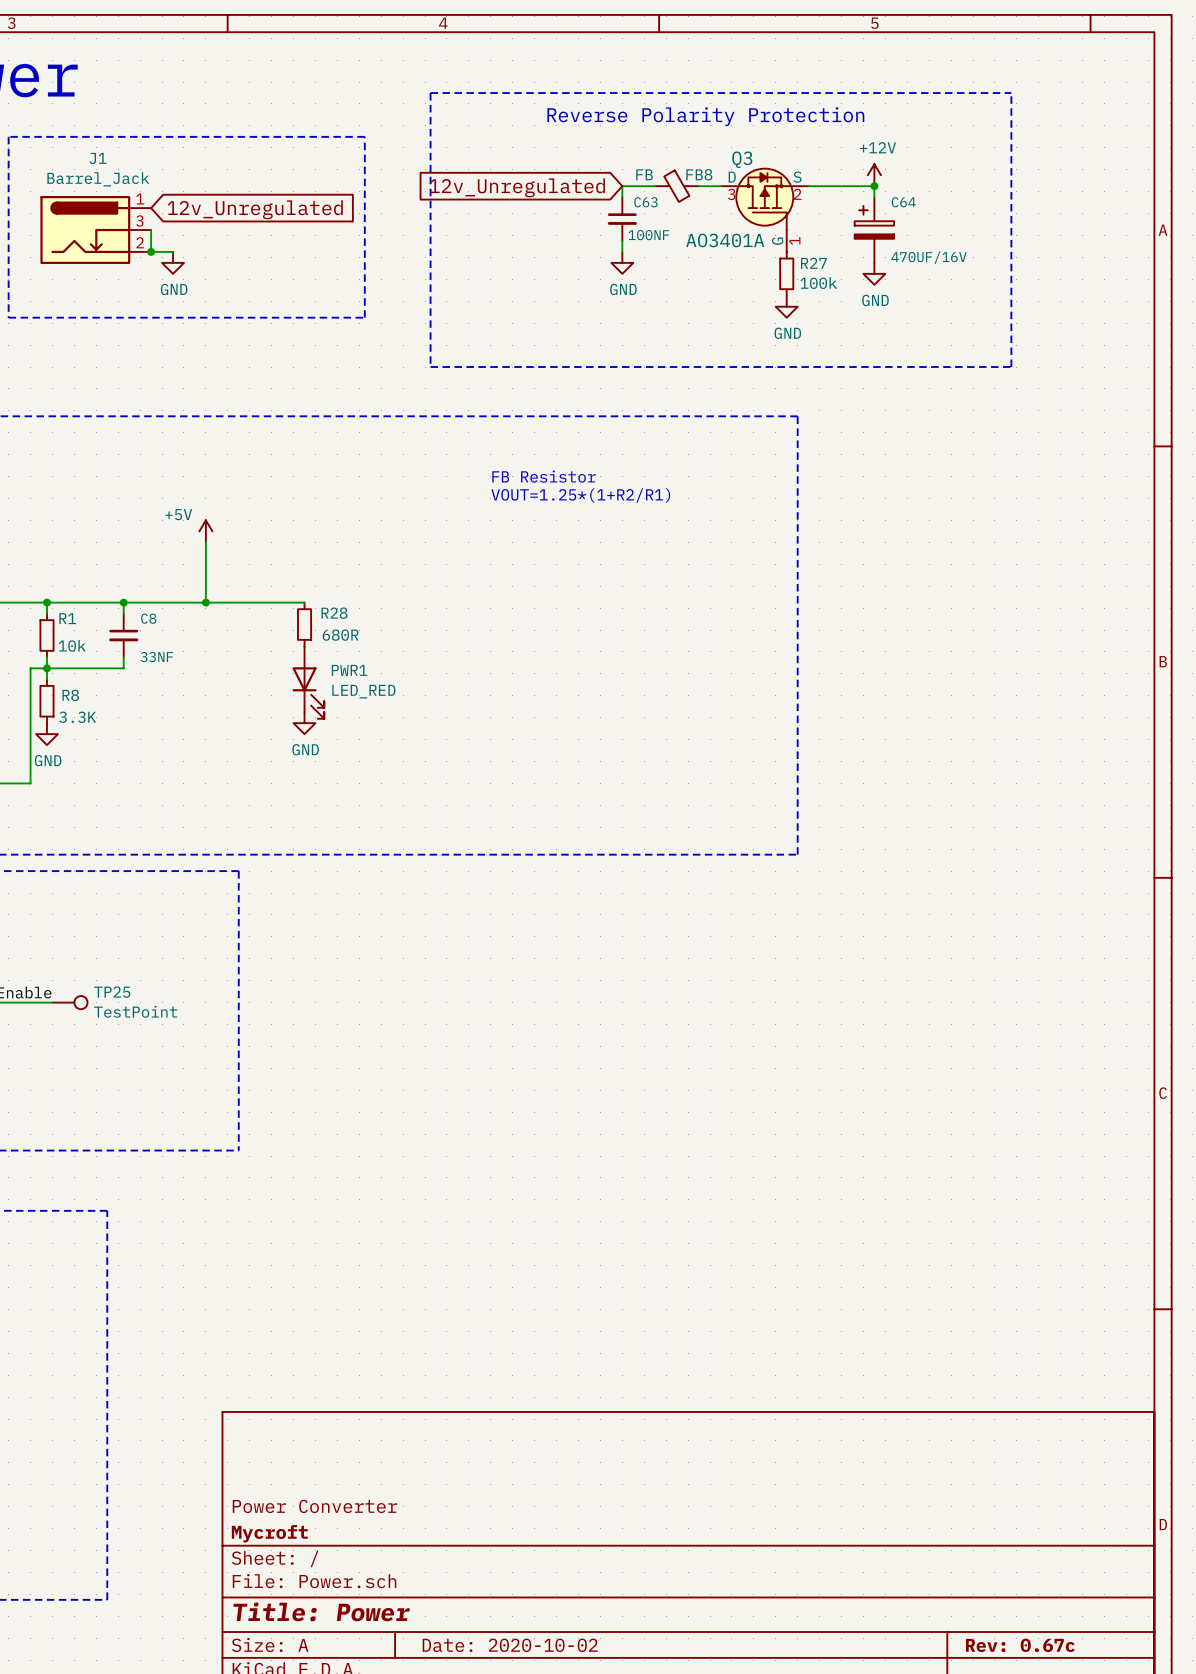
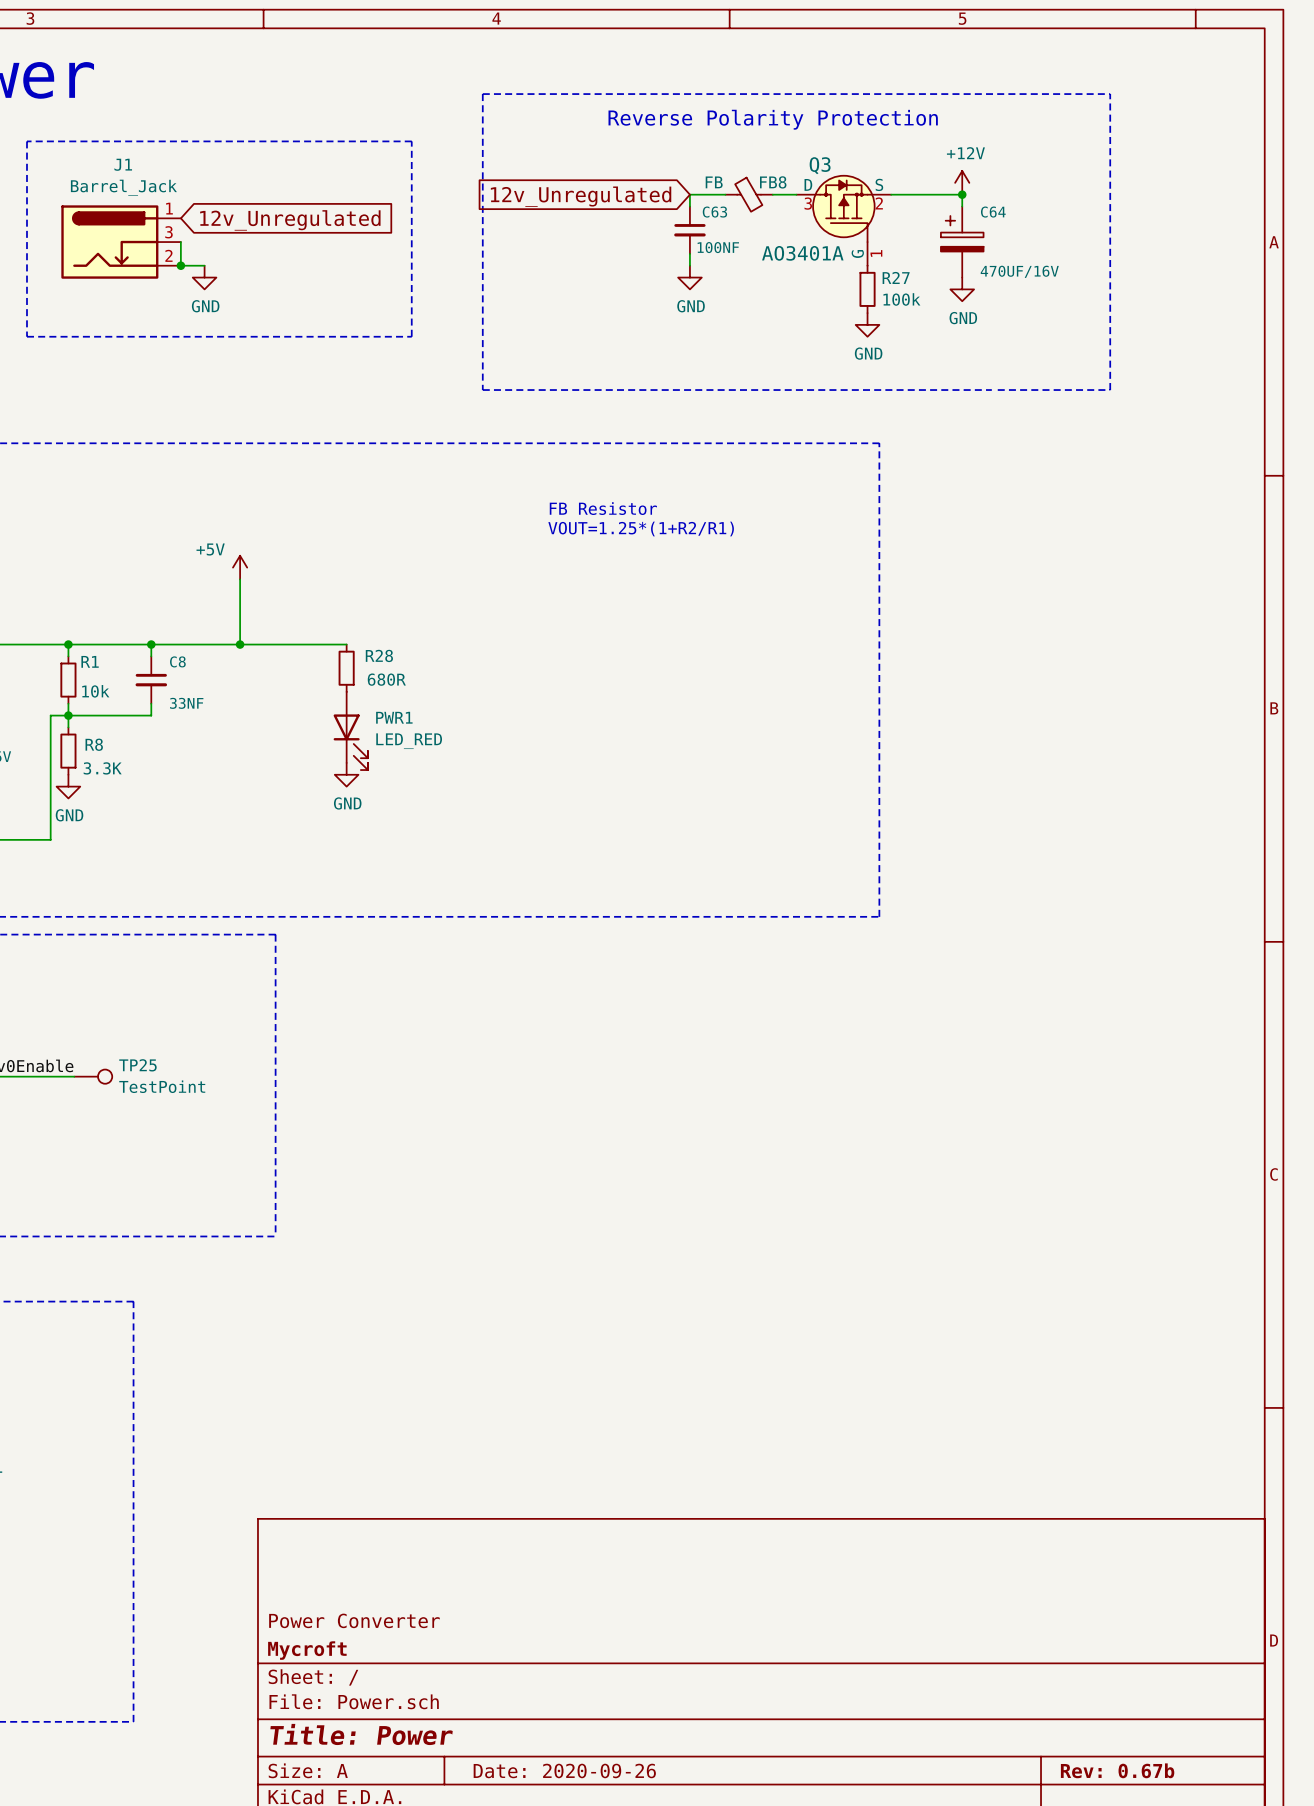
title block: Date: 2020-10-02 (510, 1645) -> Date: 2020-09-26 (564, 1770)
title block: Rev: 0.67c (1020, 1645) -> Rev: 0.67b (1117, 1770)

